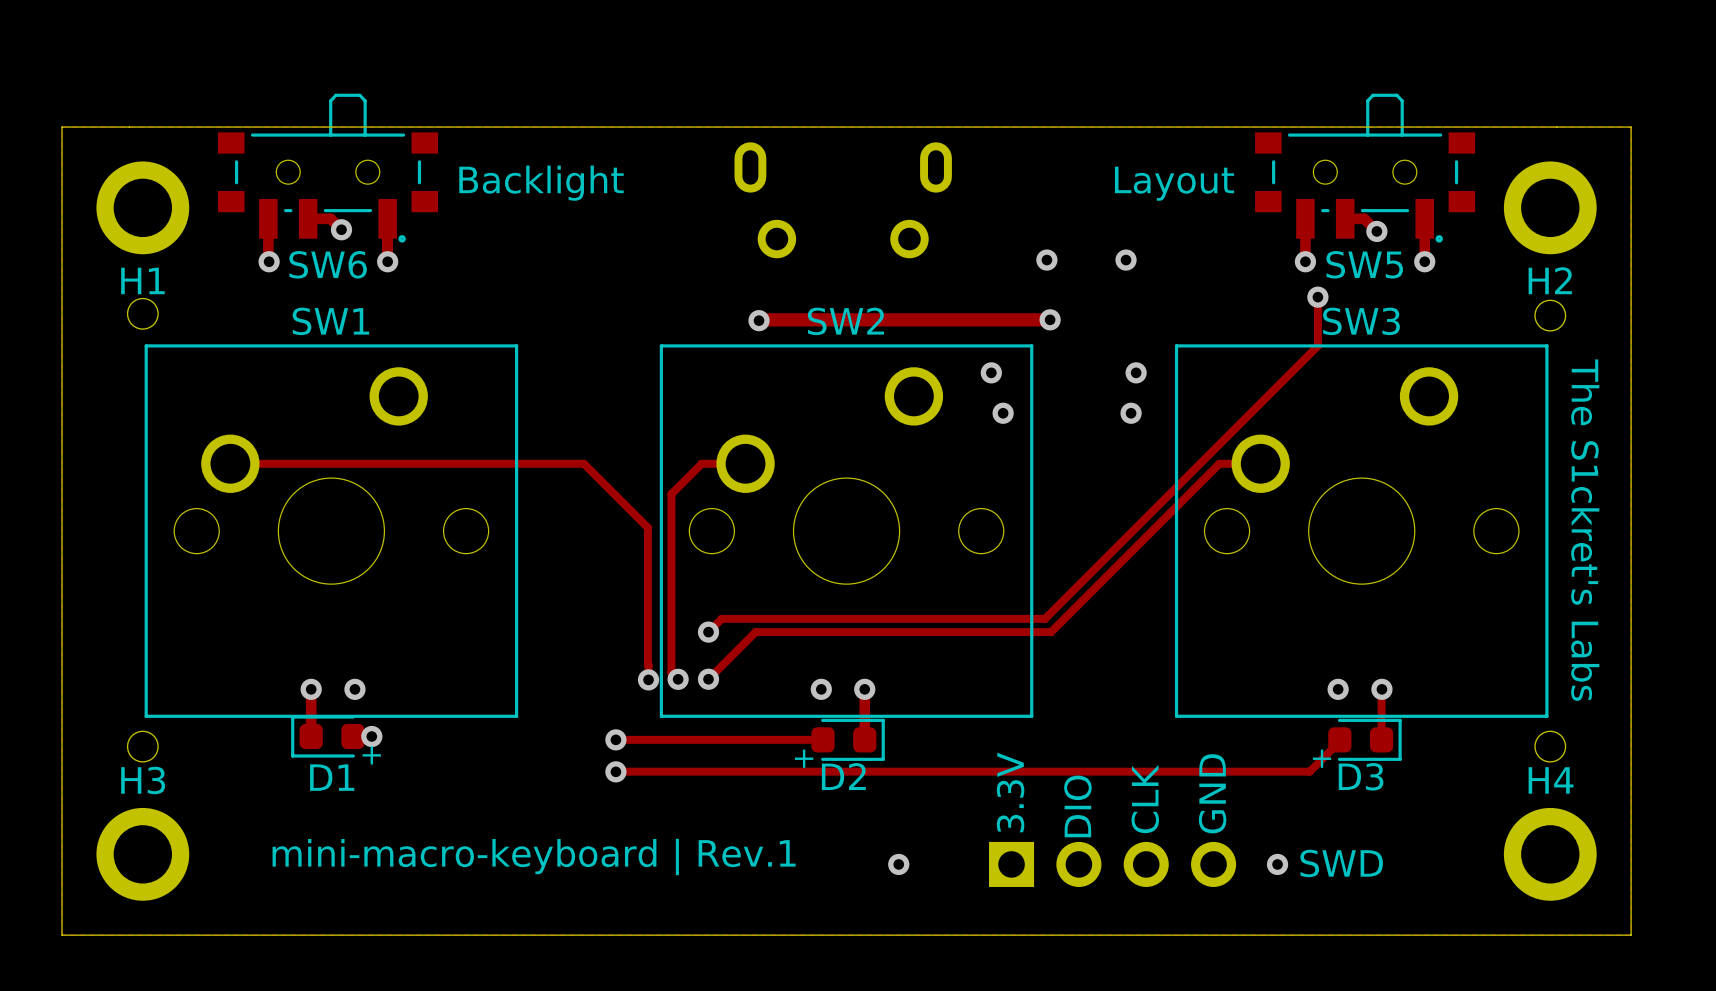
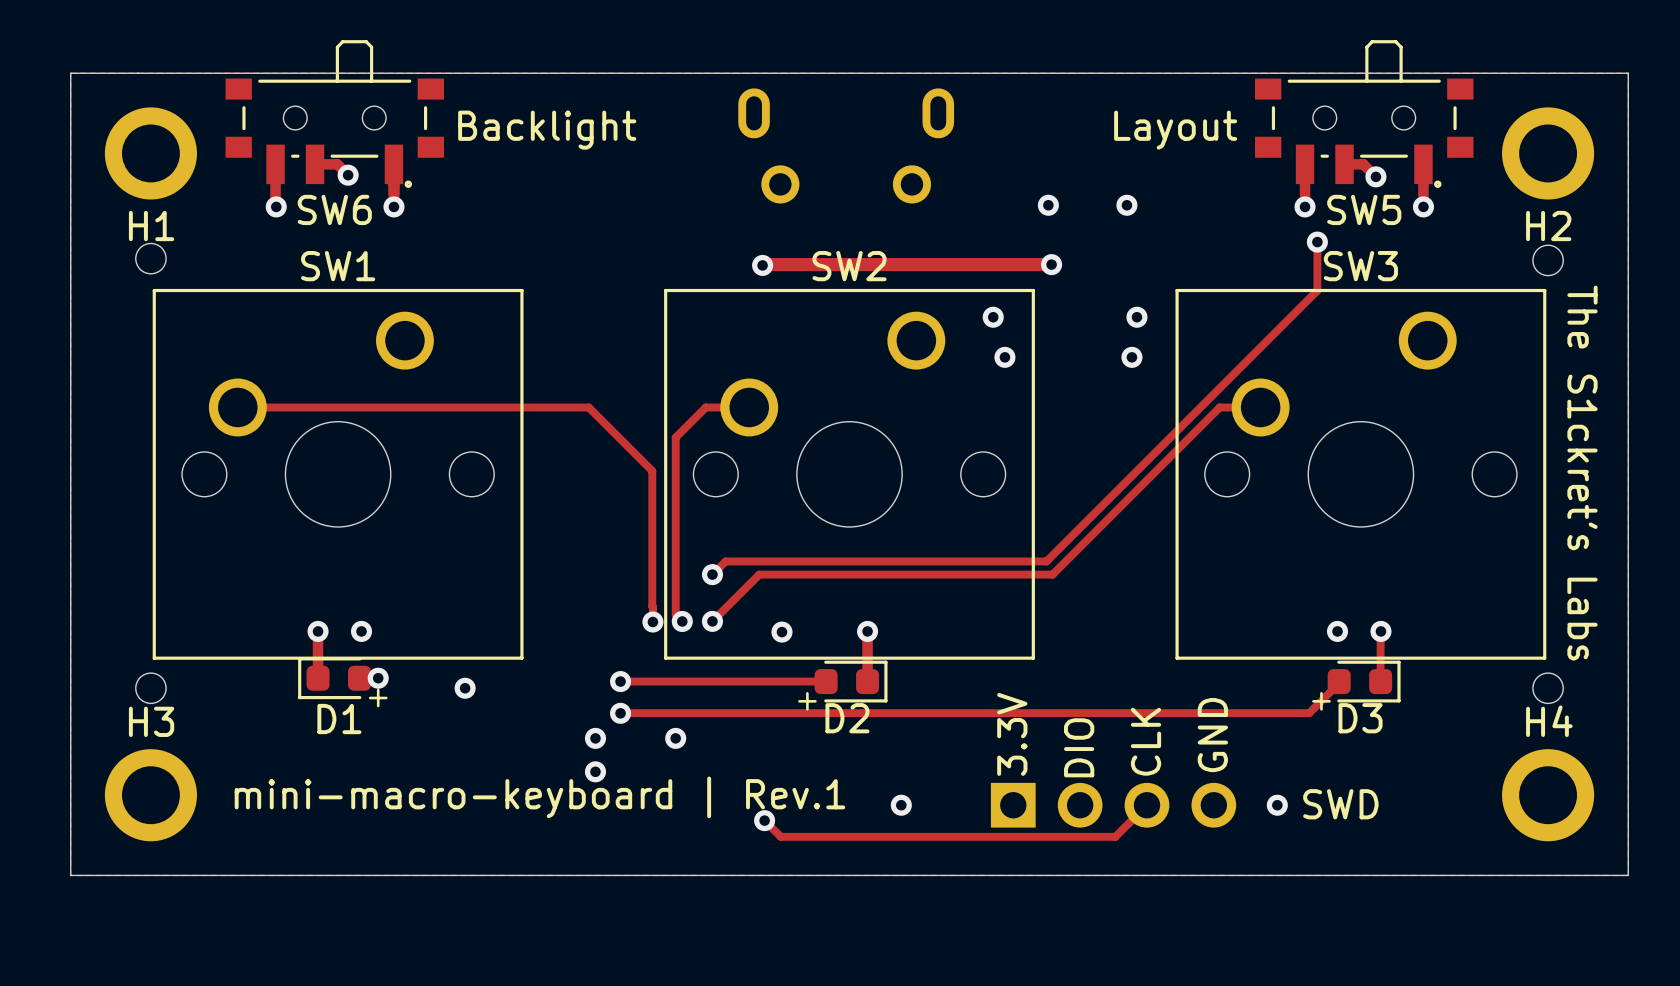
via position: (821, 689) -> (781, 632)
via: none -> (465, 688)
via: none -> (595, 738)
via: none -> (675, 738)
via: none -> (595, 771)
track: none -> (1146, 805) (1115, 836) (780, 836) (764, 820)
via: none -> (764, 820)

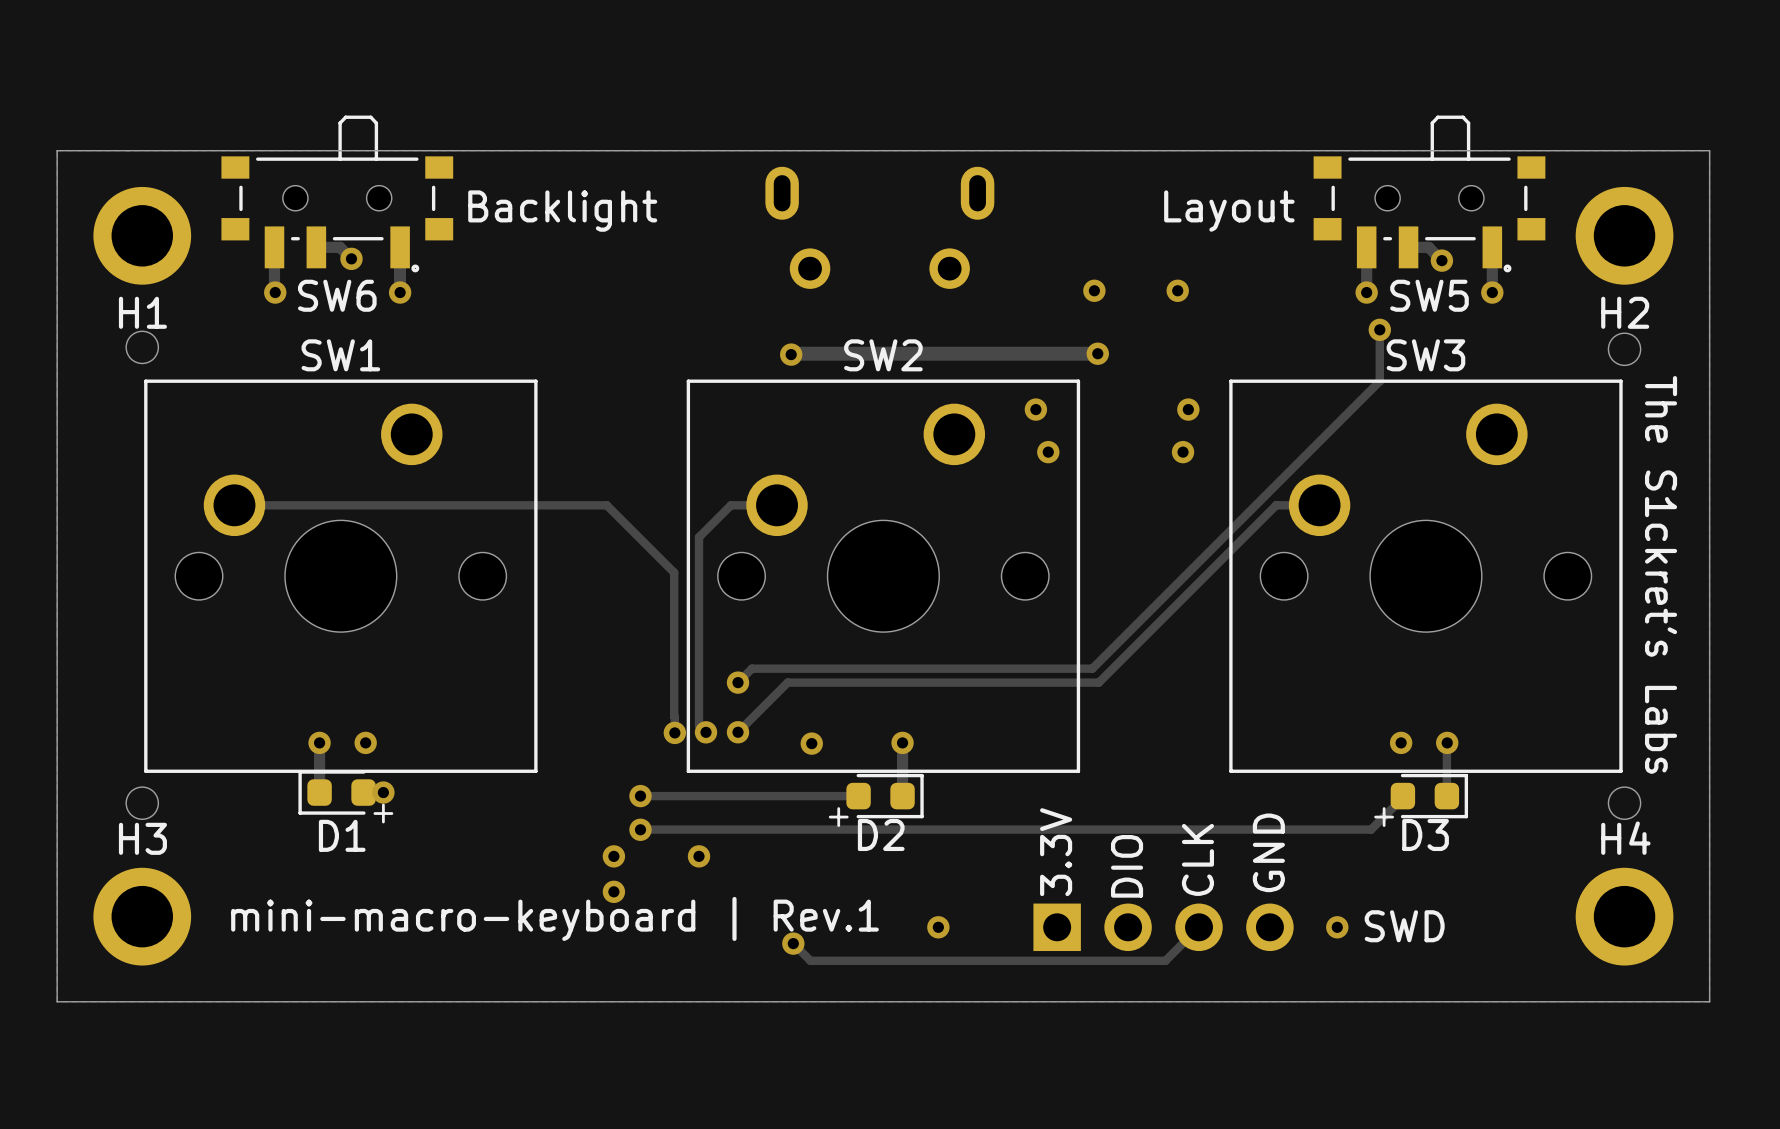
via: (465, 688) -> none

